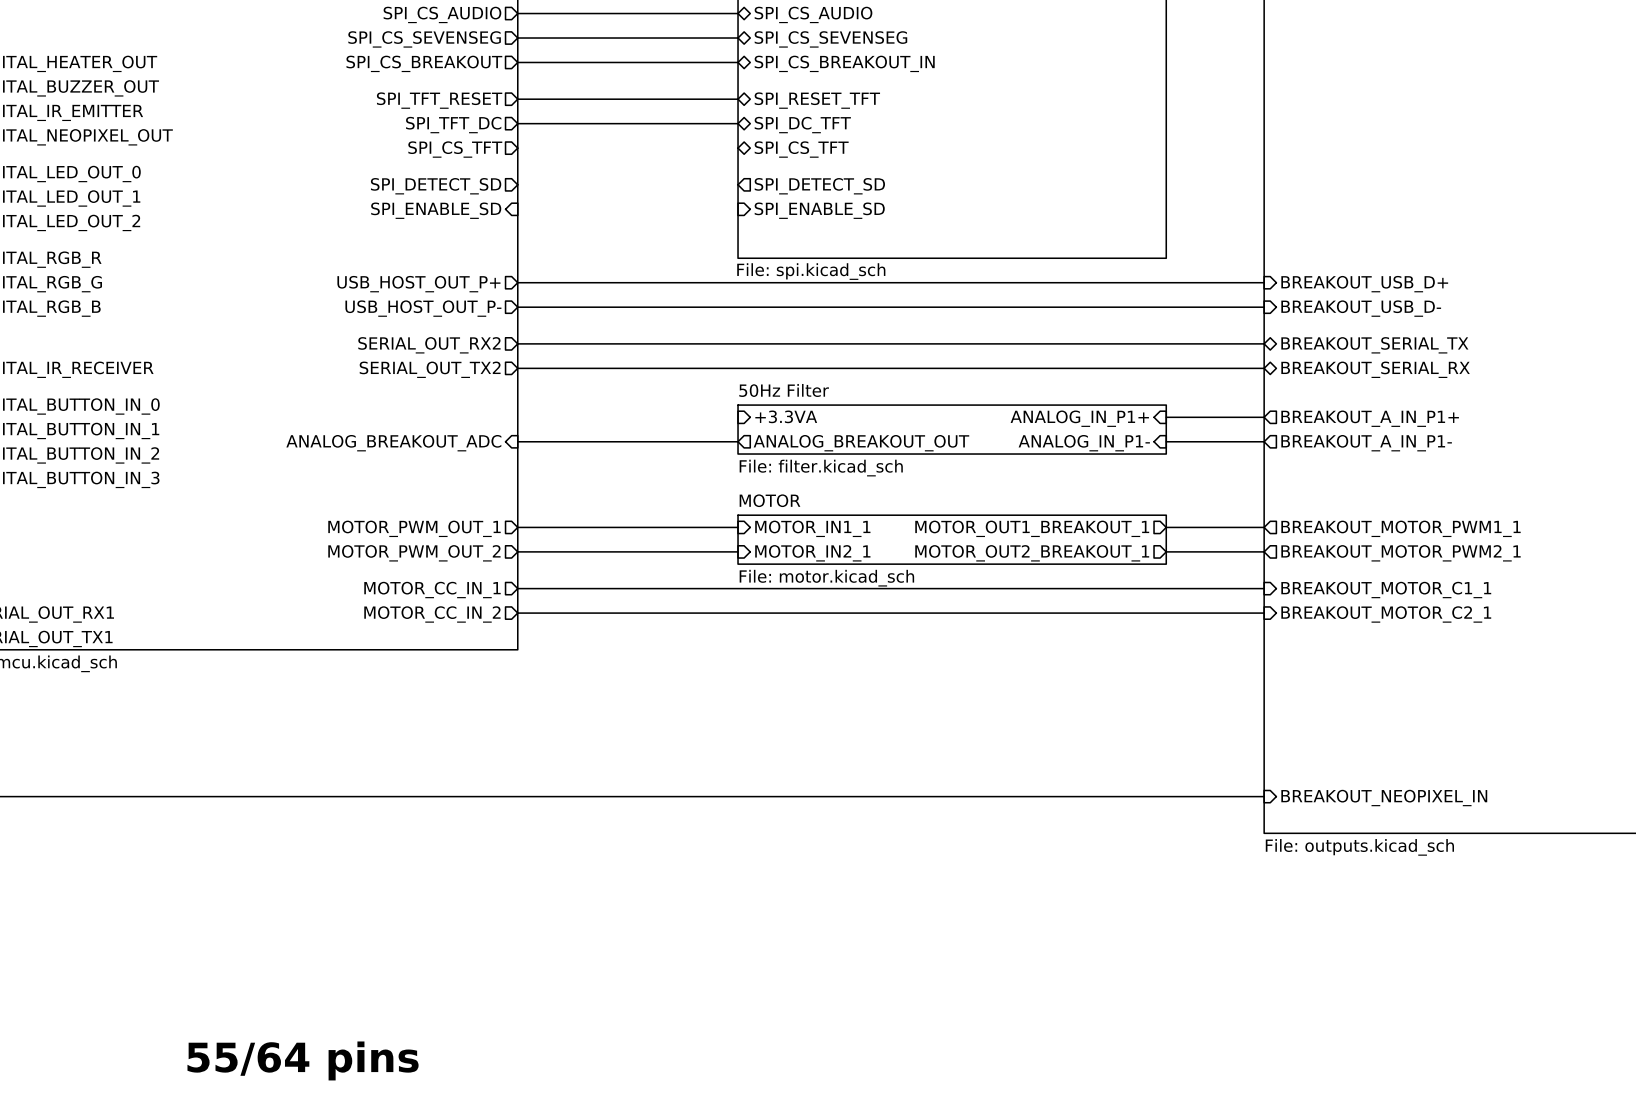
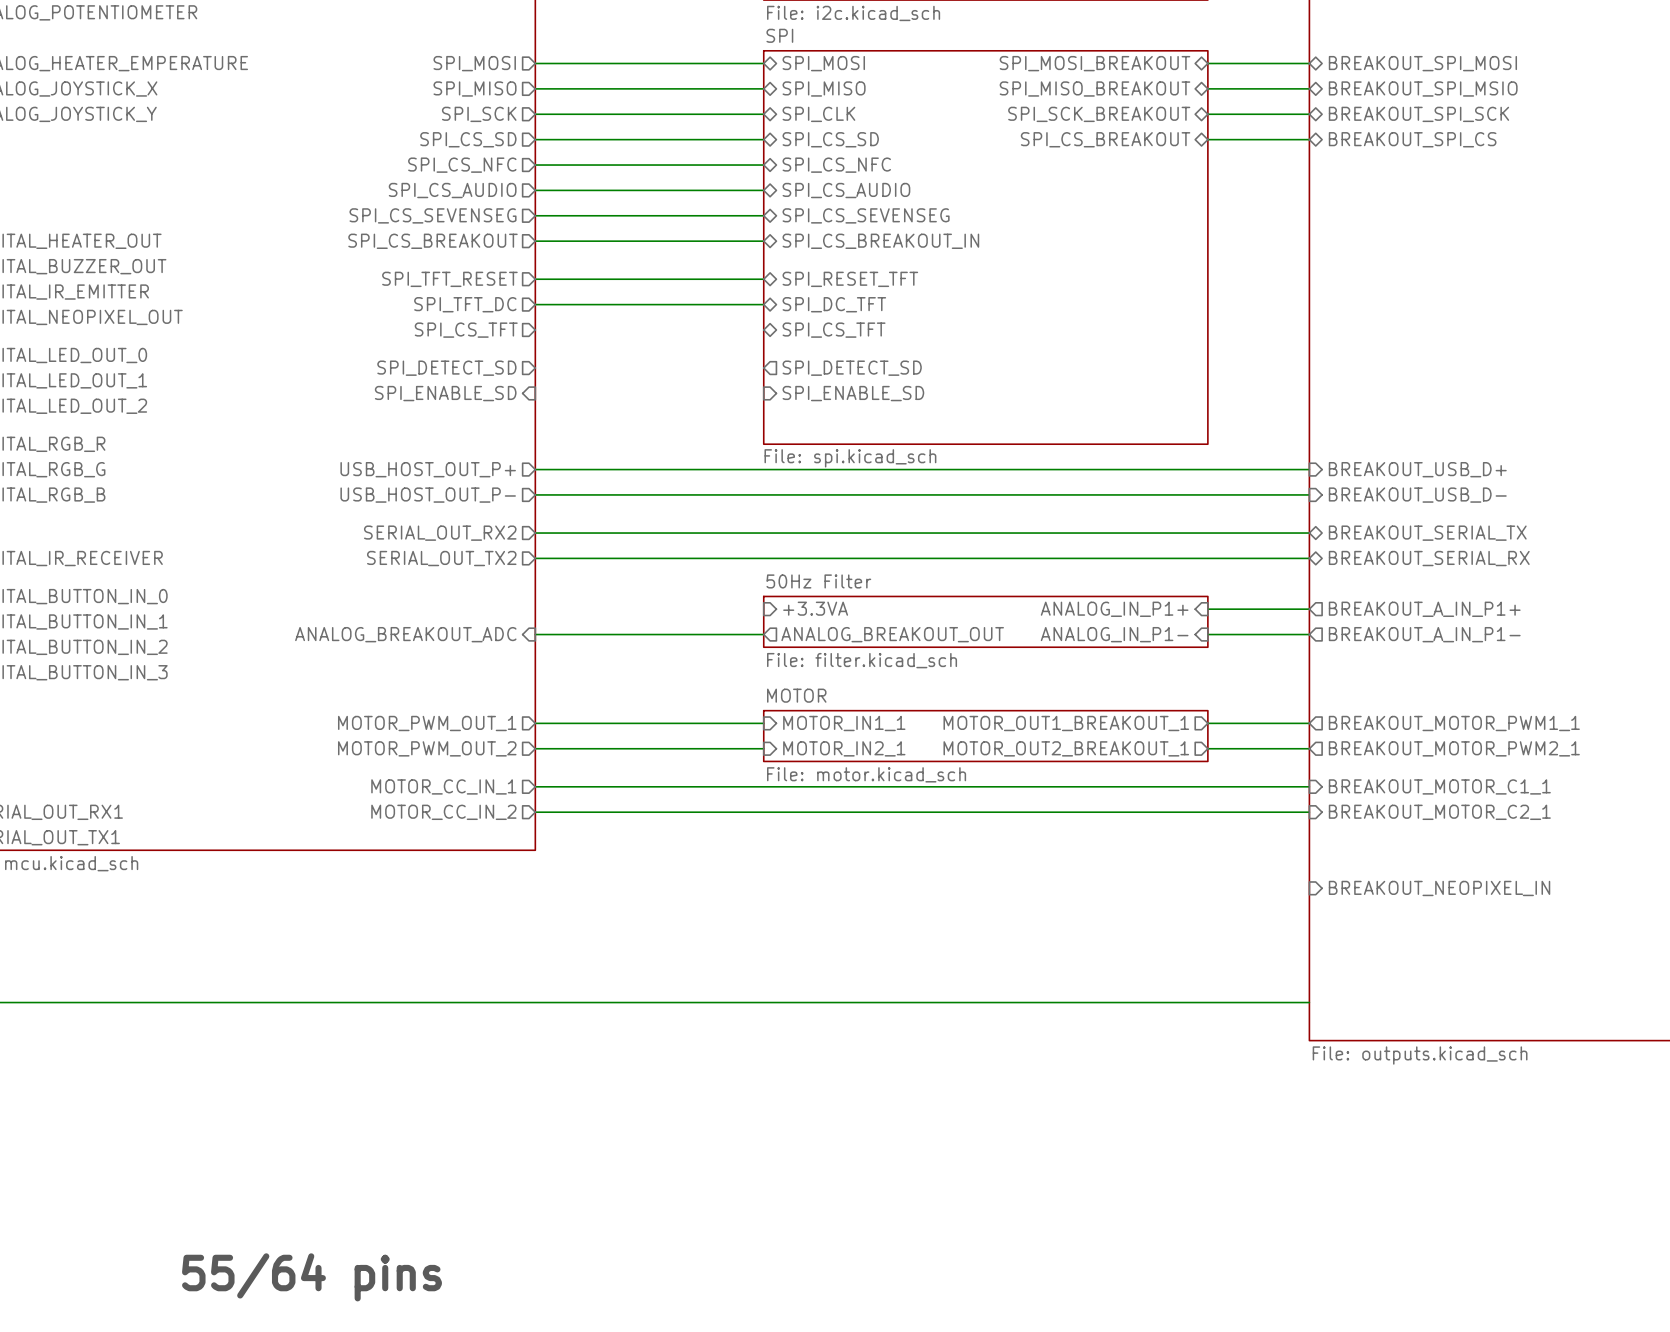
sheet pin position: BREAKOUT_NEOPIXEL_IN (1384, 798) -> BREAKOUT_NEOPIXEL_IN (1439, 888)

